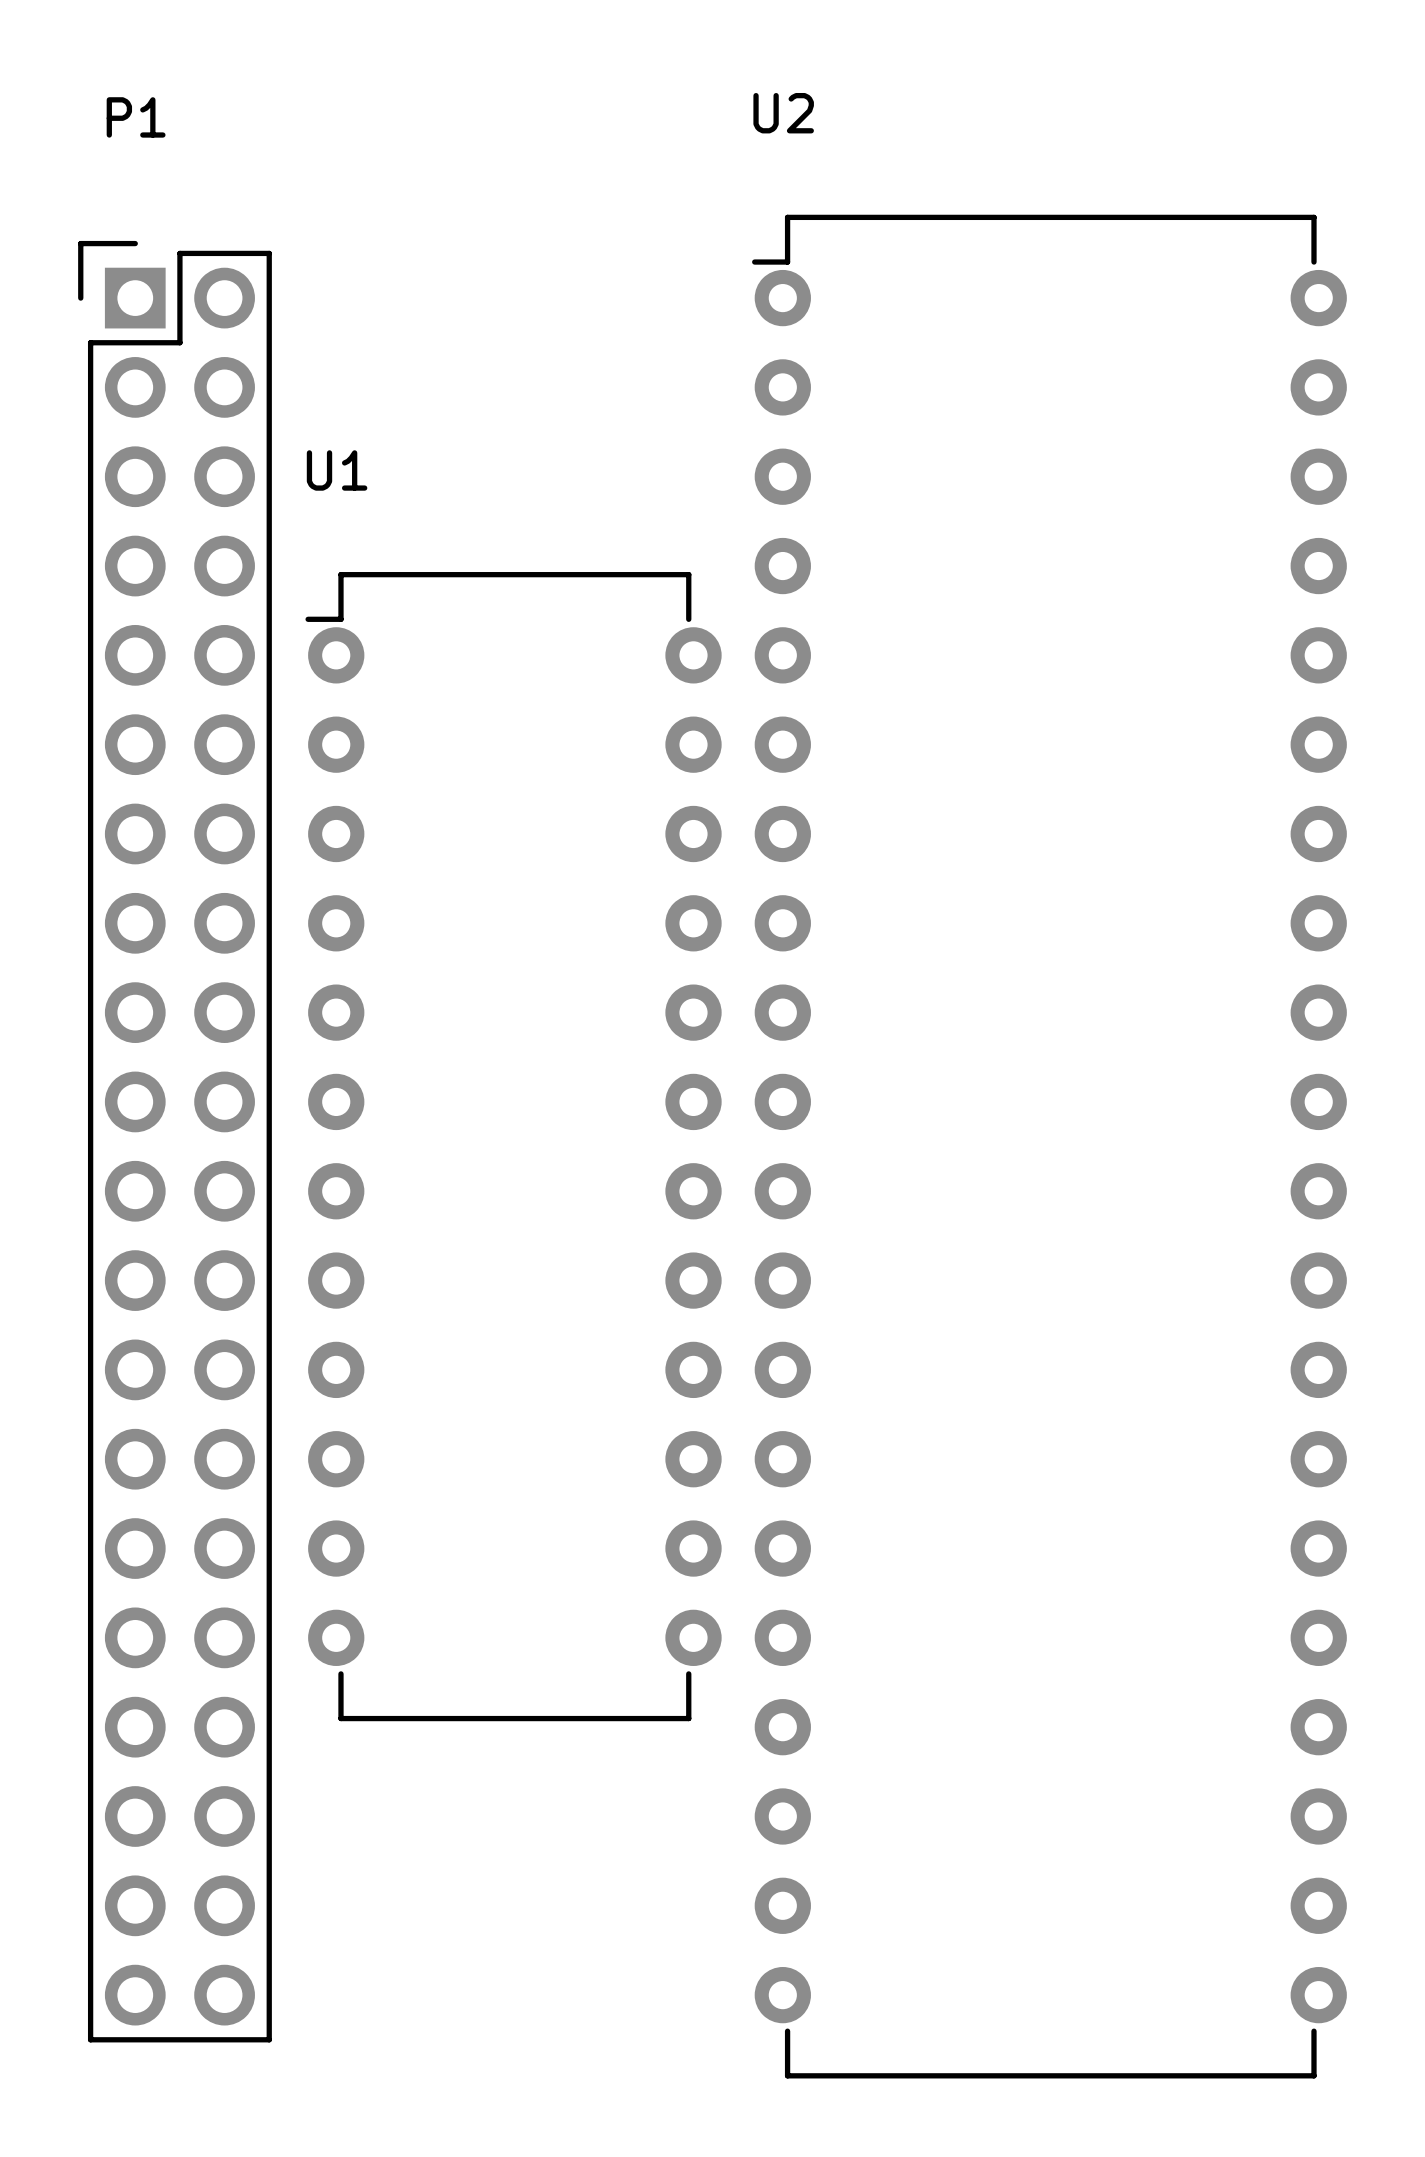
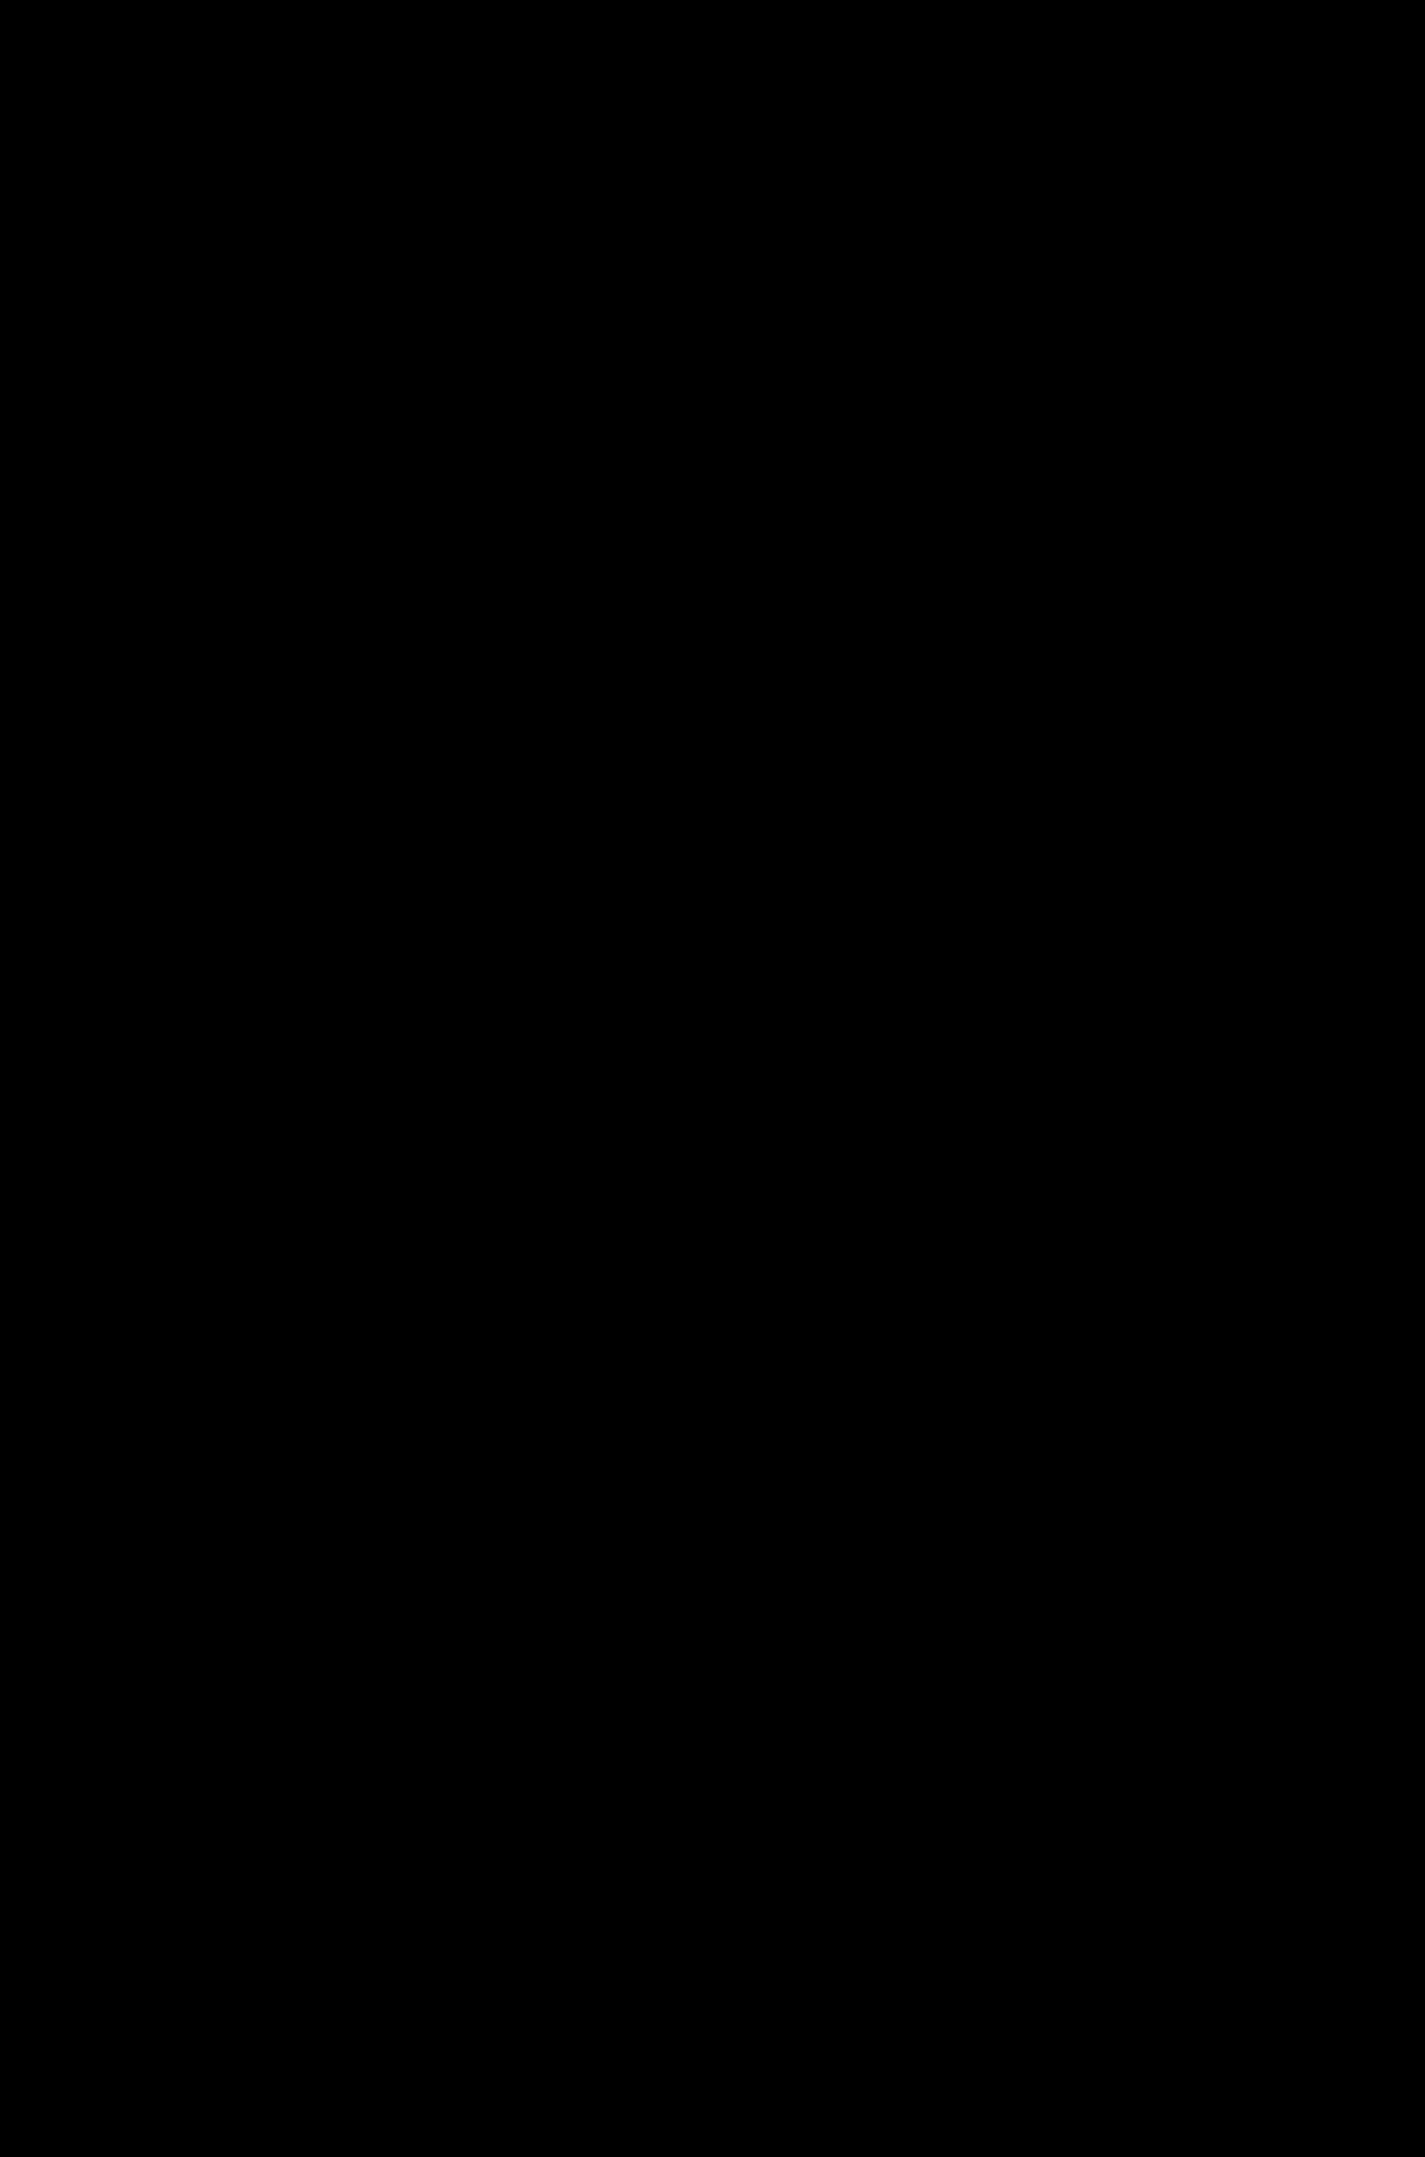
P1: (175, 1141) -> none
U1: (513, 1146) -> none
U2: (1049, 1146) -> none

